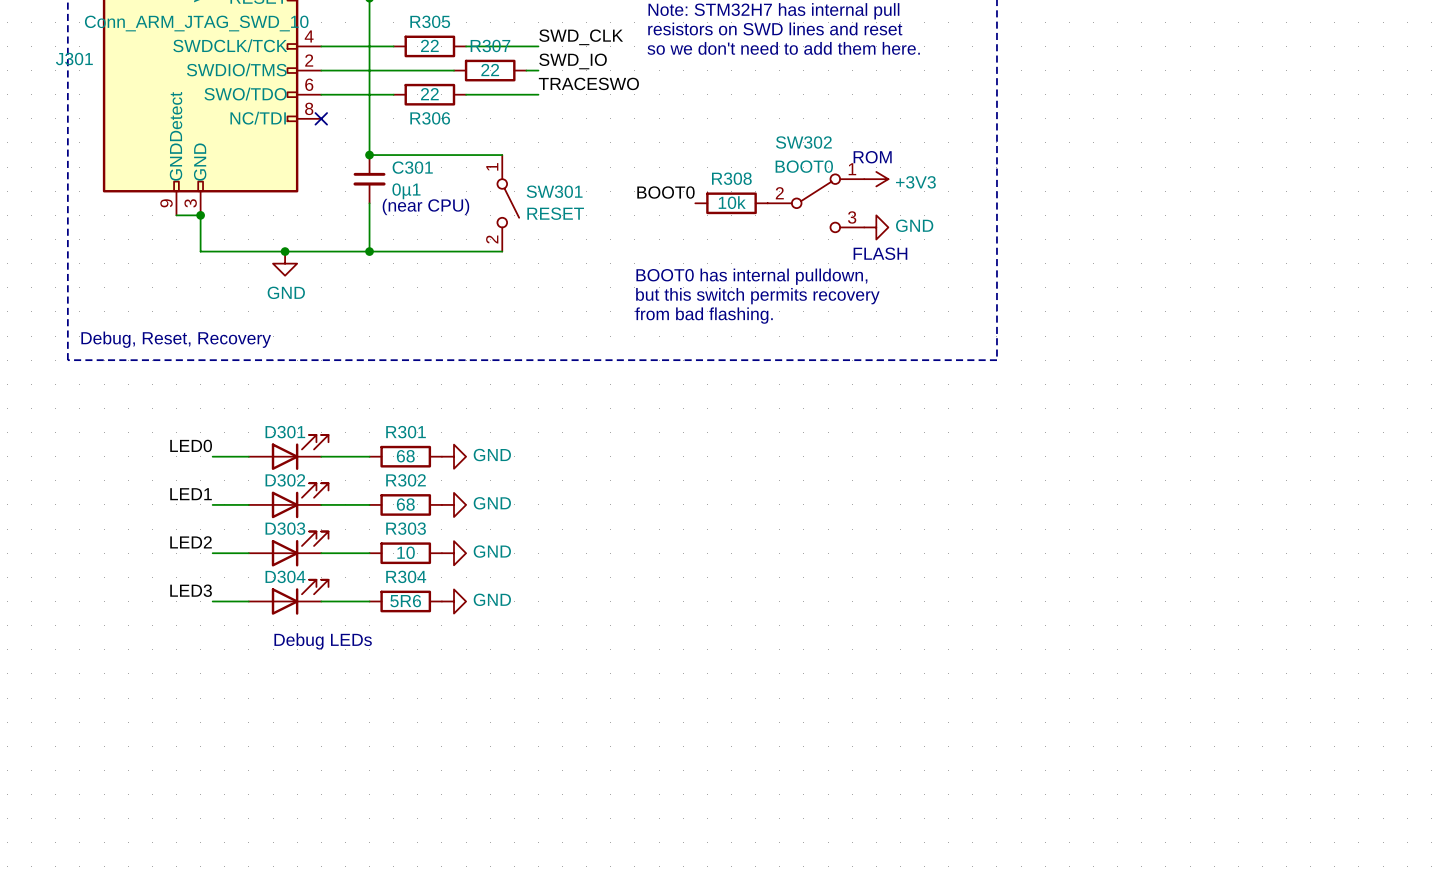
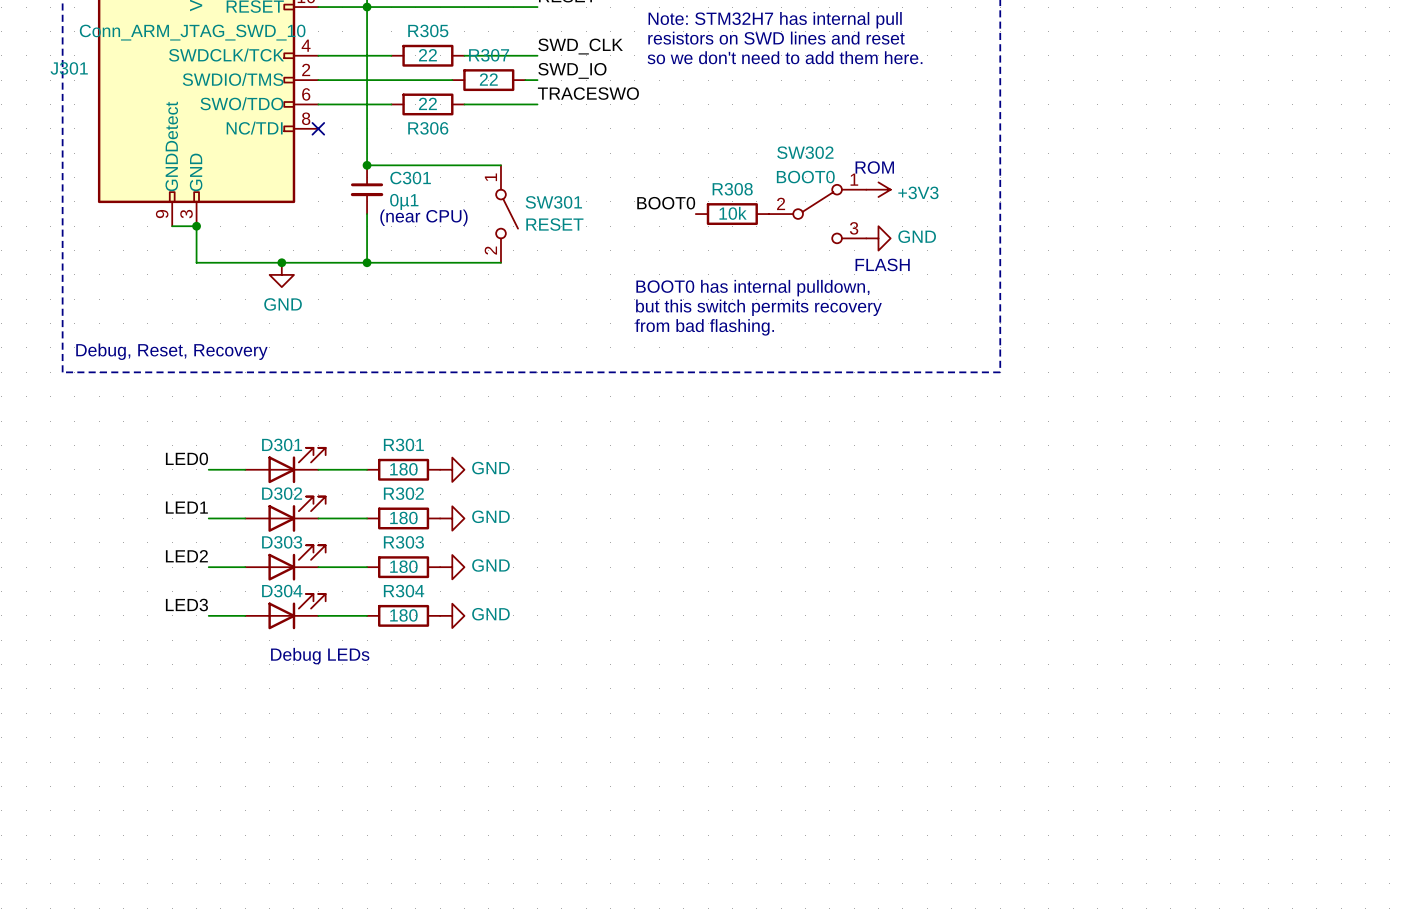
R301 value: 68 (405, 456) -> 180 (403, 469)
R302 value: 68 (405, 504) -> 180 (403, 518)
R303 value: 10 (406, 552) -> 180 (403, 566)
R304 value: 5R6 (405, 601) -> 180 (403, 615)

